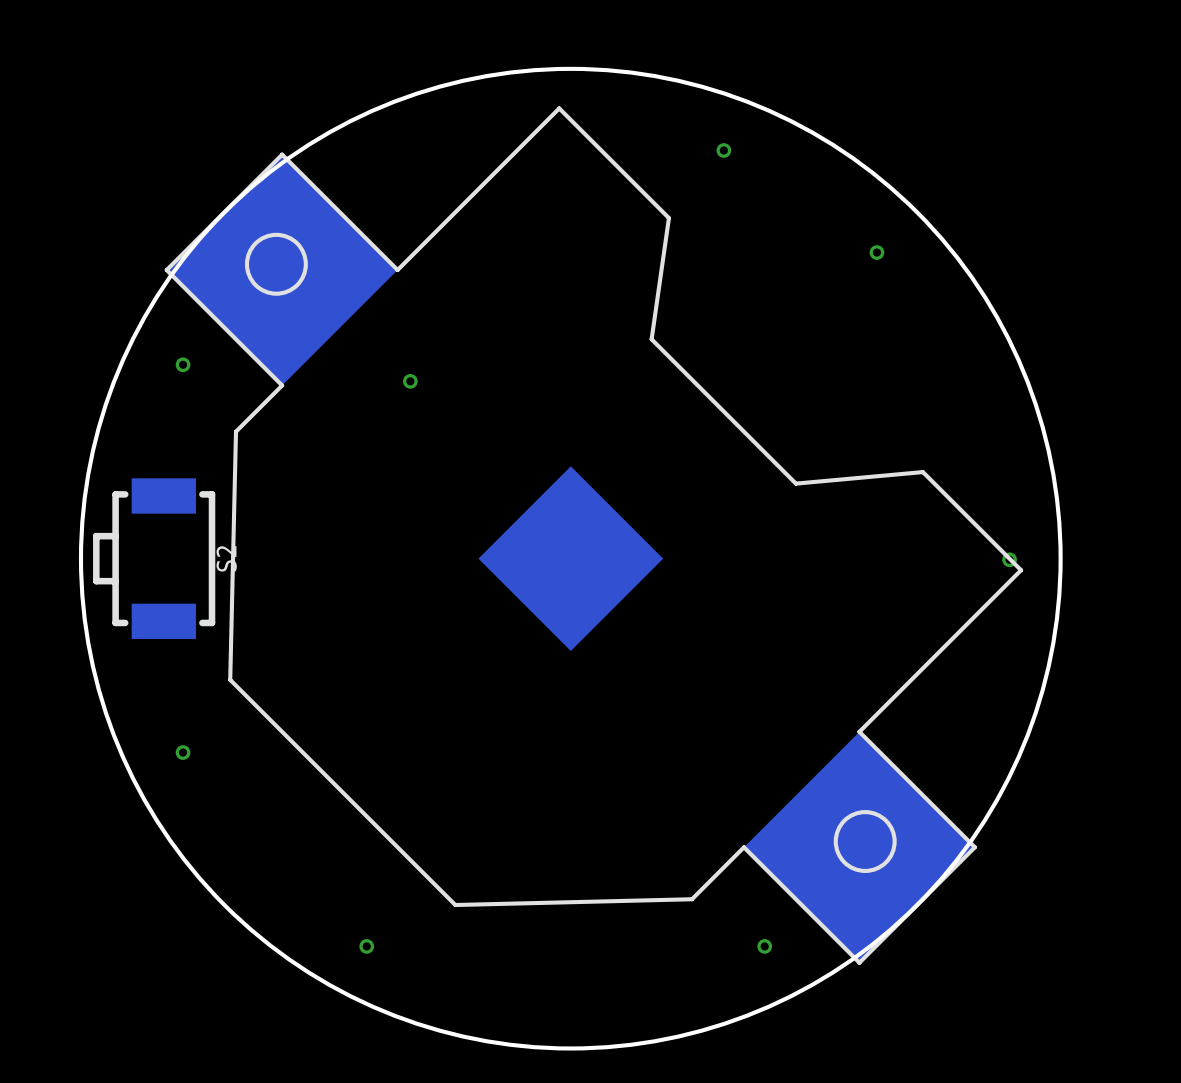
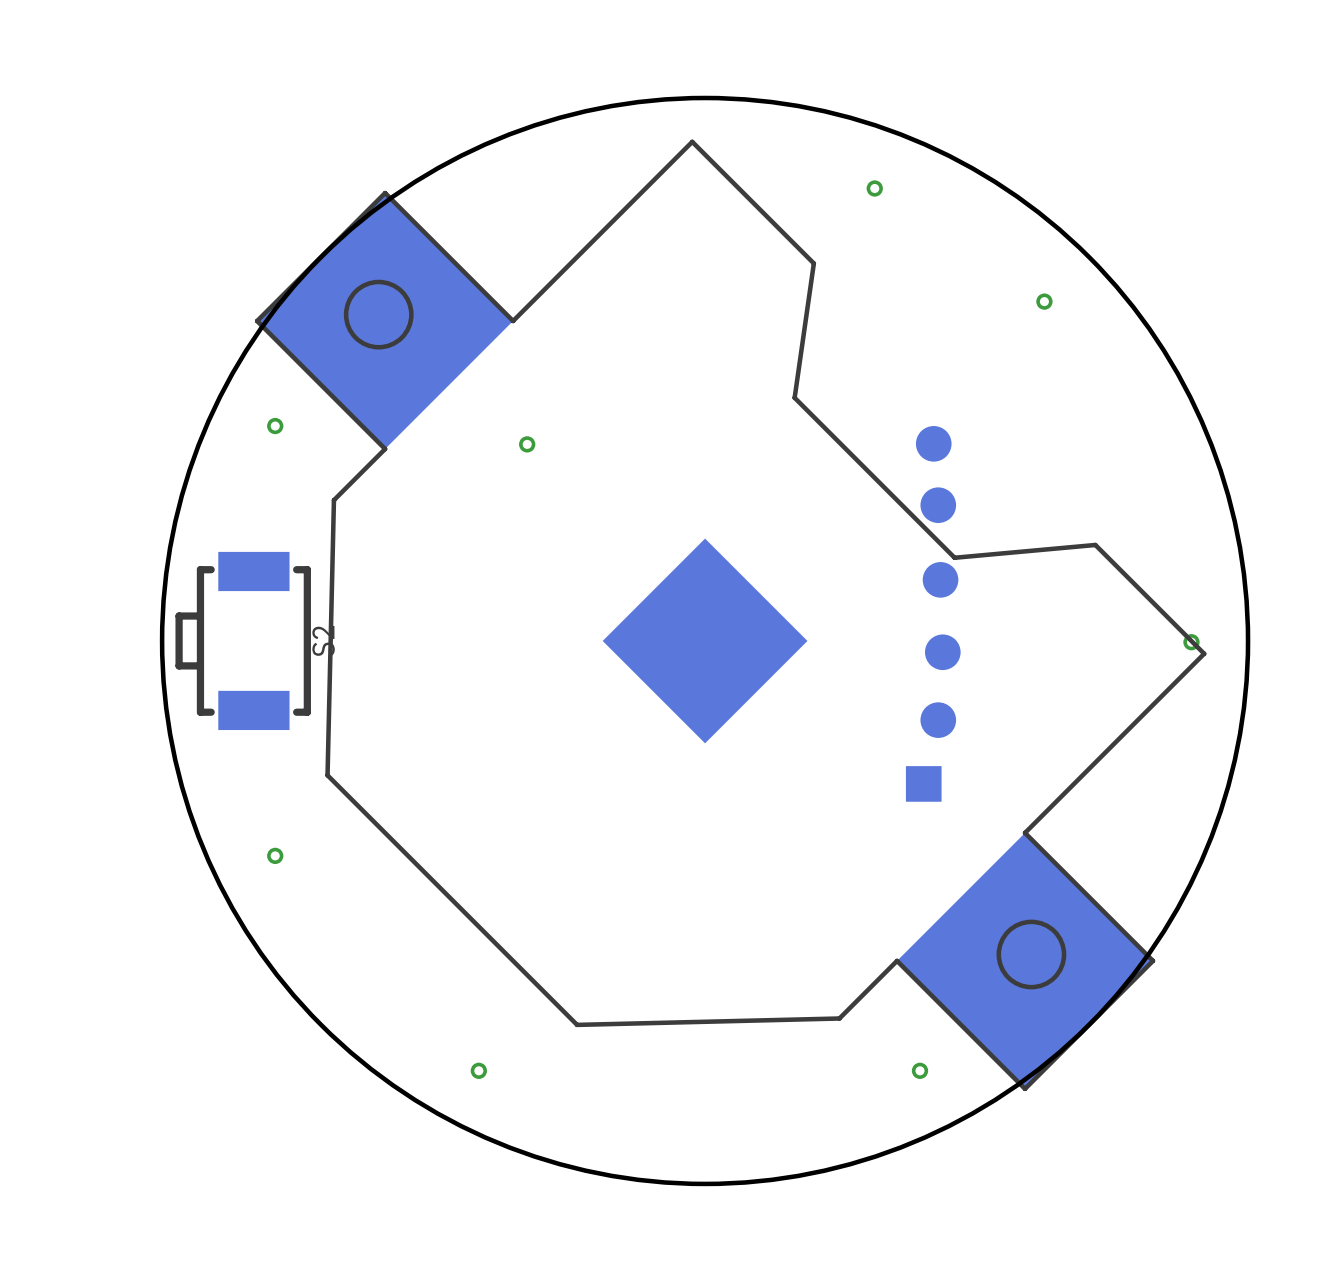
part: none -> (933, 443)
part: none -> (938, 505)
part: none -> (940, 579)
part: none -> (942, 652)
part: none -> (938, 720)
part: none -> (923, 783)

